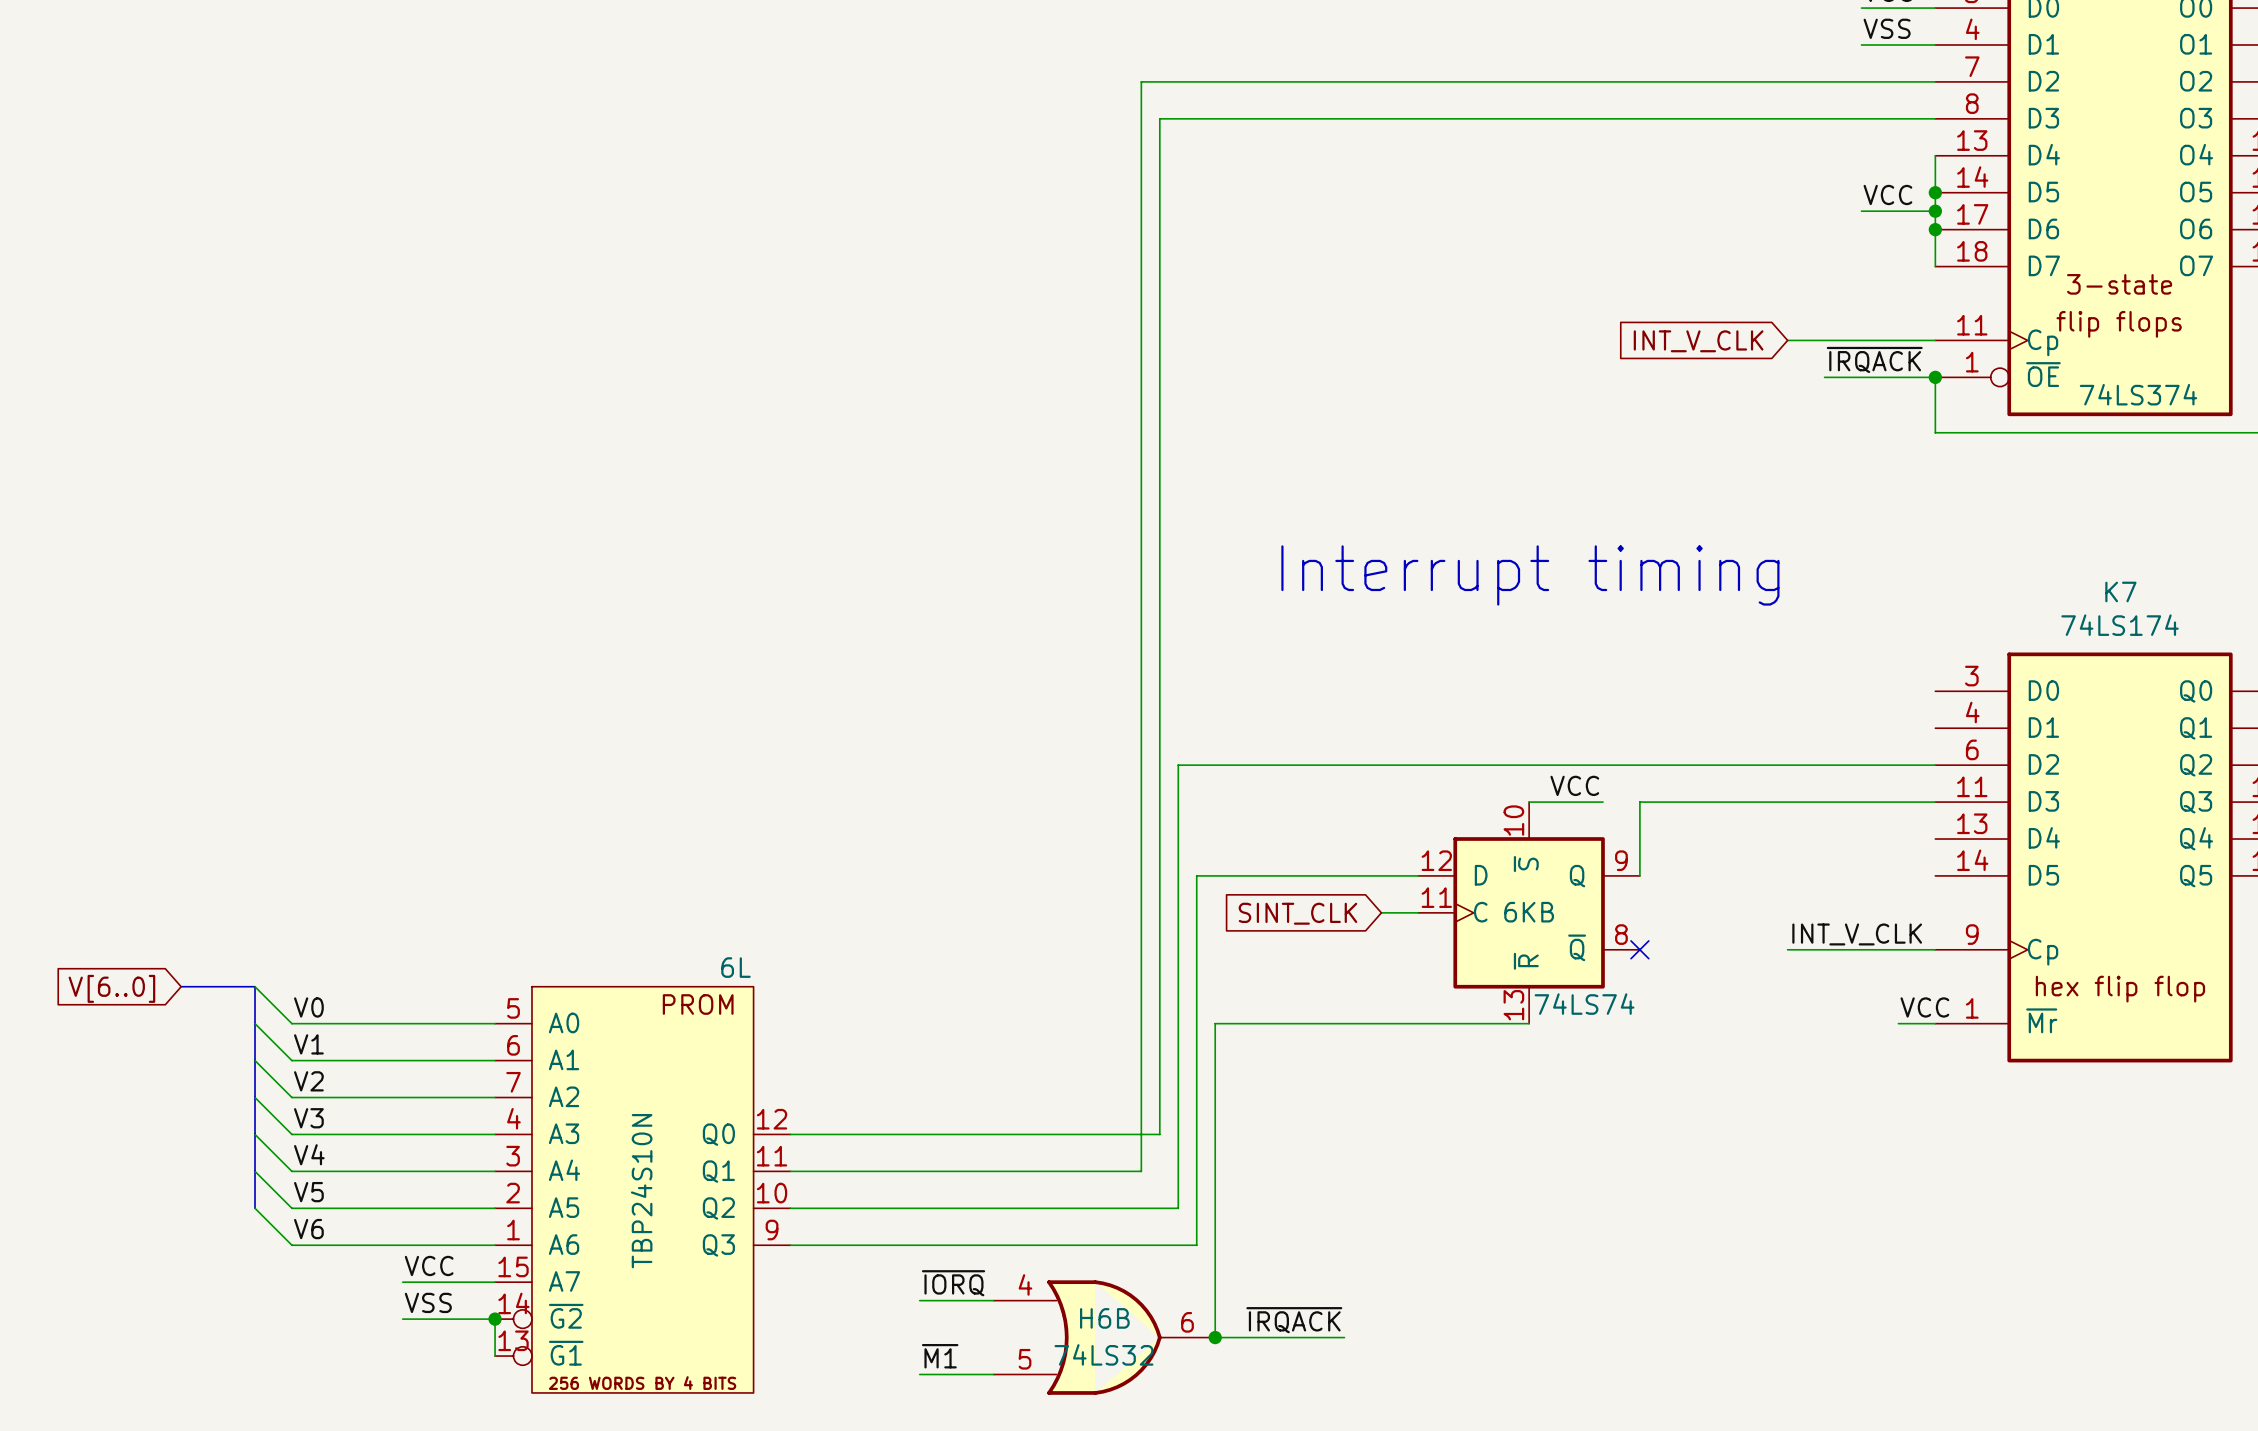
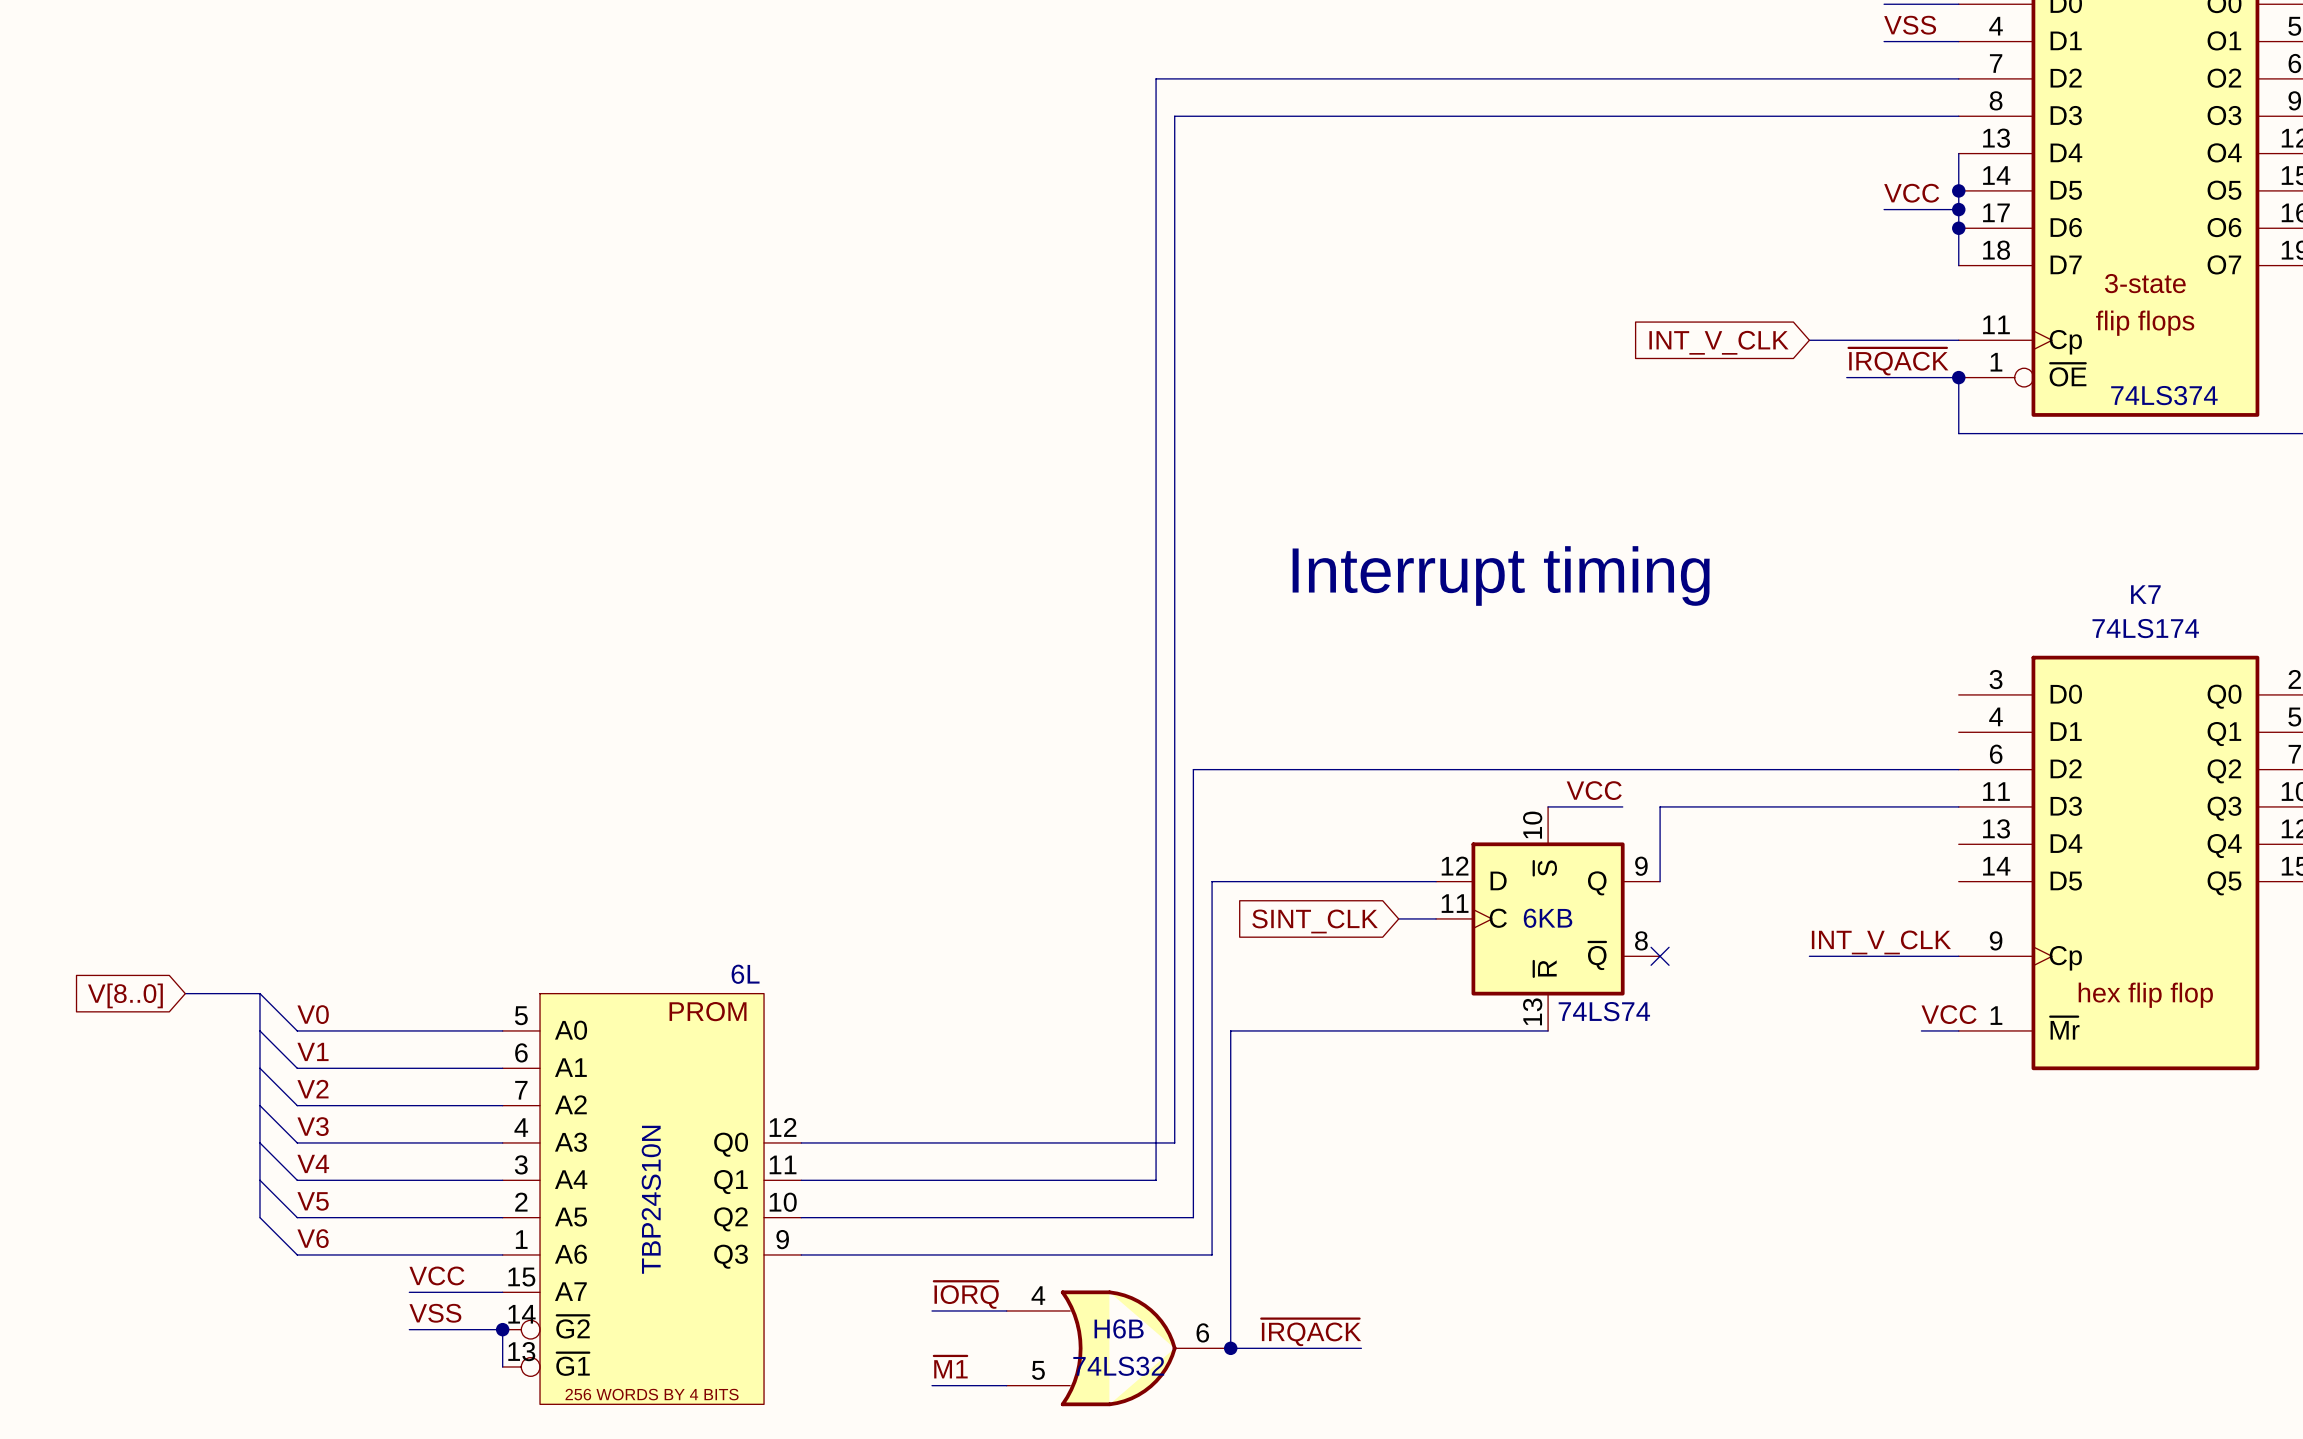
global label: V[6..0] (111, 988) -> V[8..0] (125, 995)

